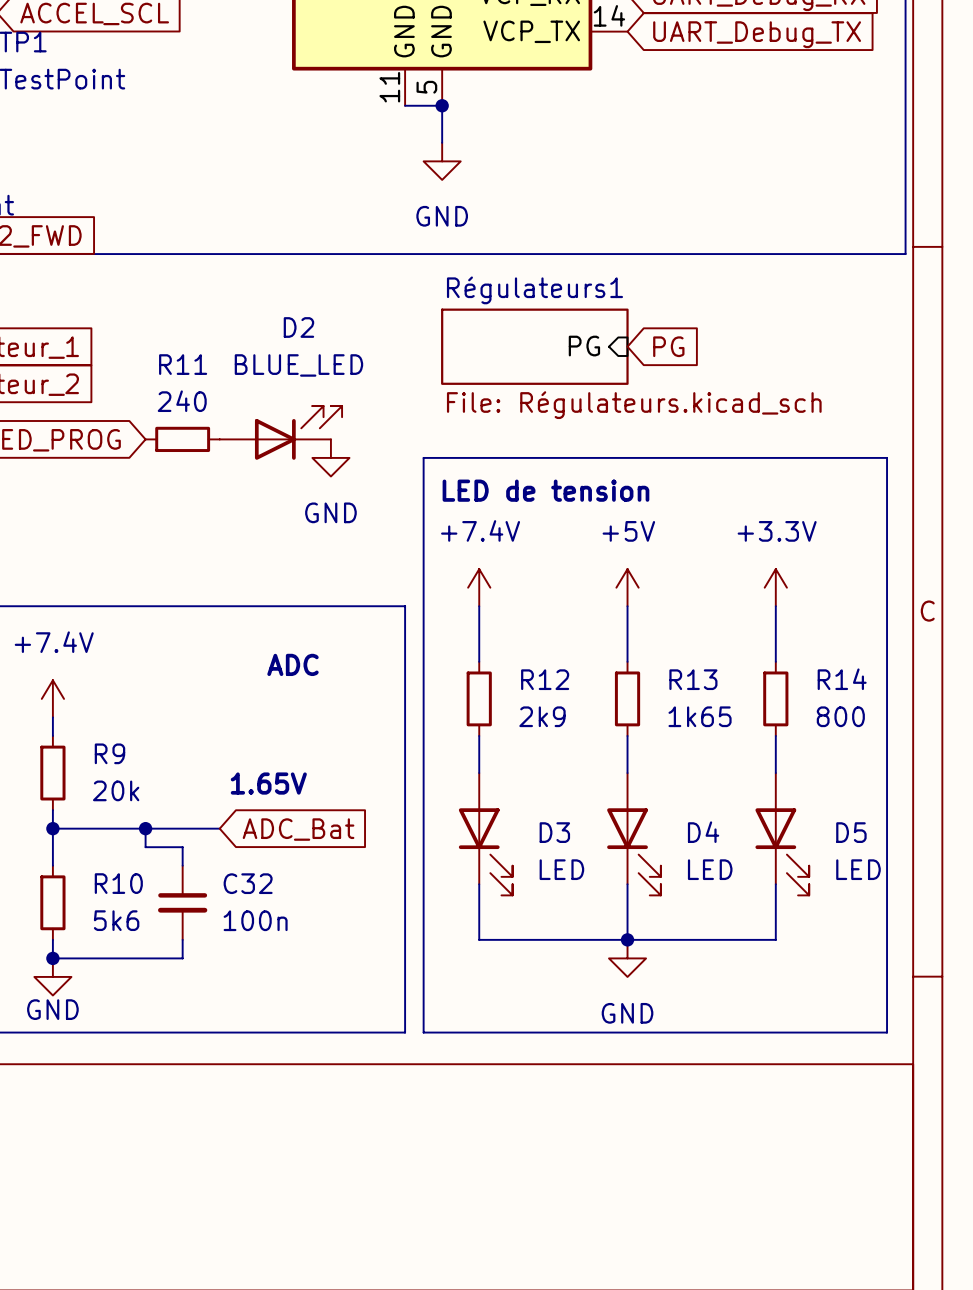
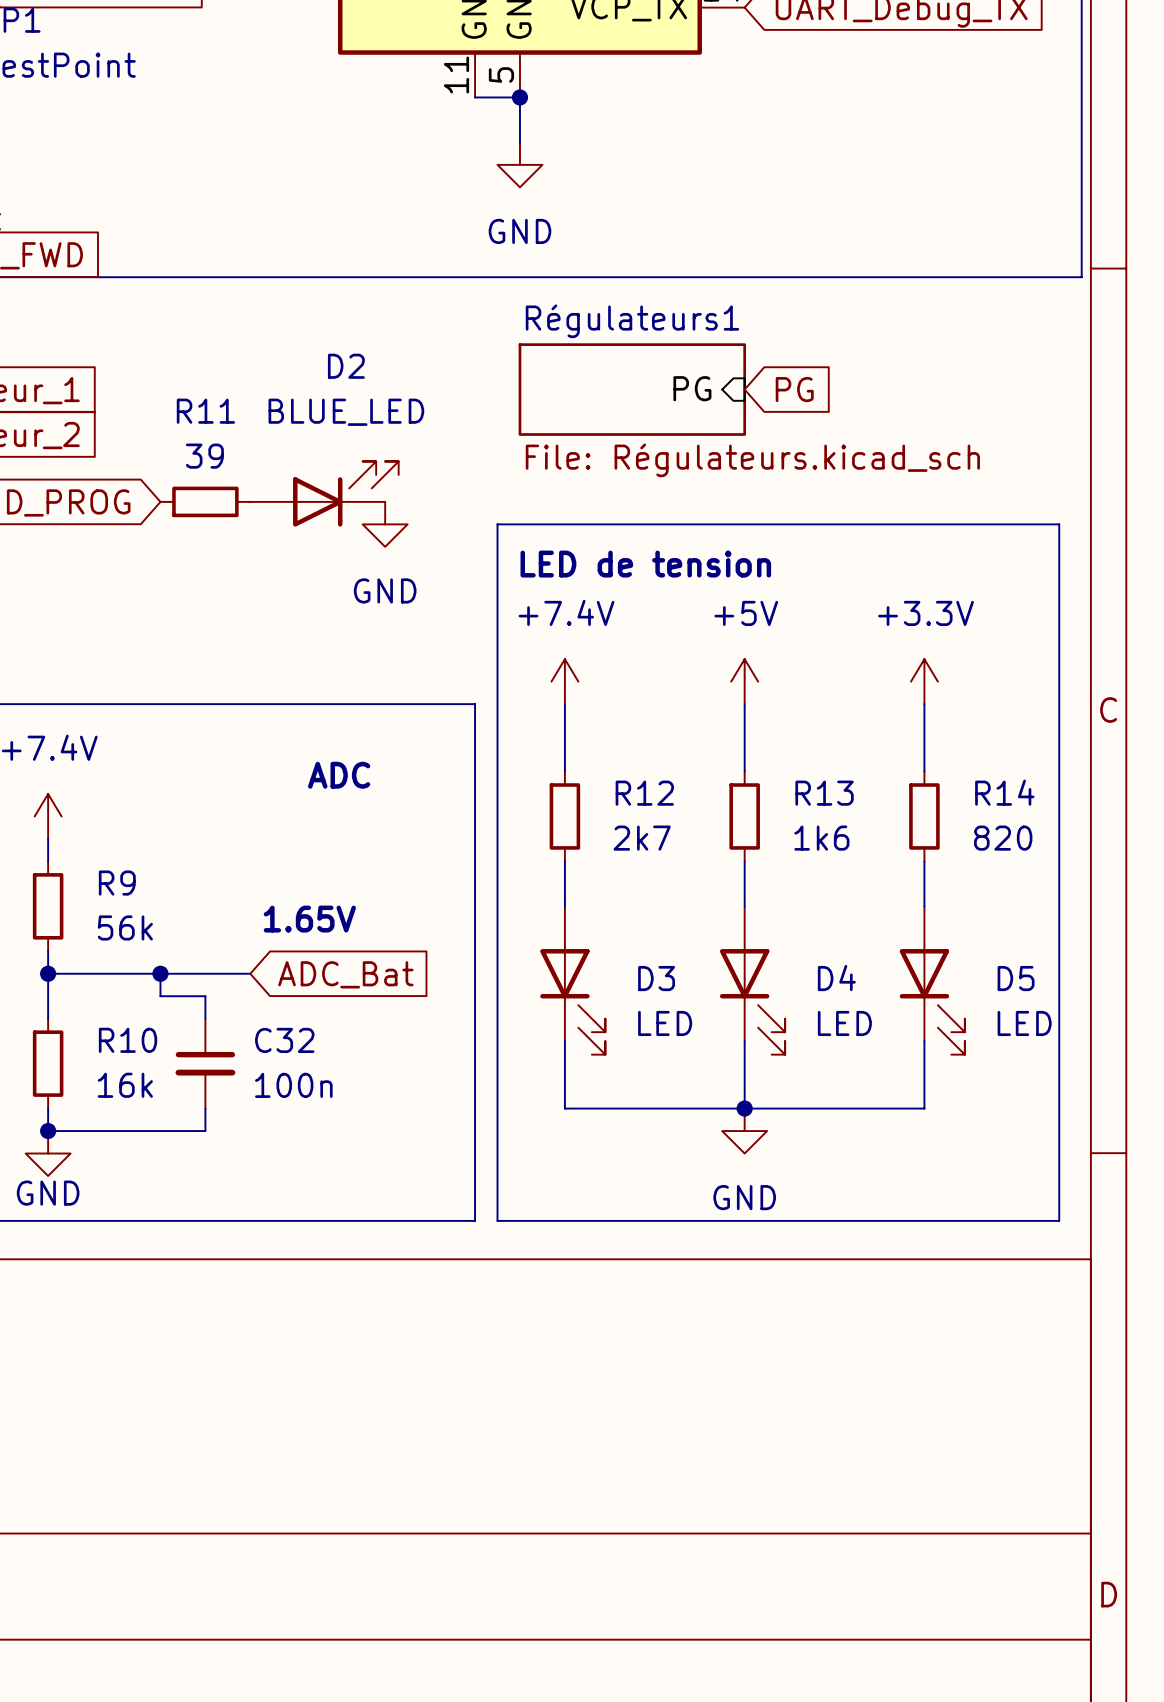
R11 value: 240 (182, 401) -> 39 (204, 456)
R12 value: 2k9 (542, 716) -> 2k7 (642, 838)
R13 value: 1k65 (700, 716) -> 1k6 (821, 838)
R14 value: 800 (840, 716) -> 820 (1003, 838)
R9 value: 20k (116, 790) -> 56k (125, 927)
R10 value: 5k6 (116, 920) -> 16k (125, 1085)

